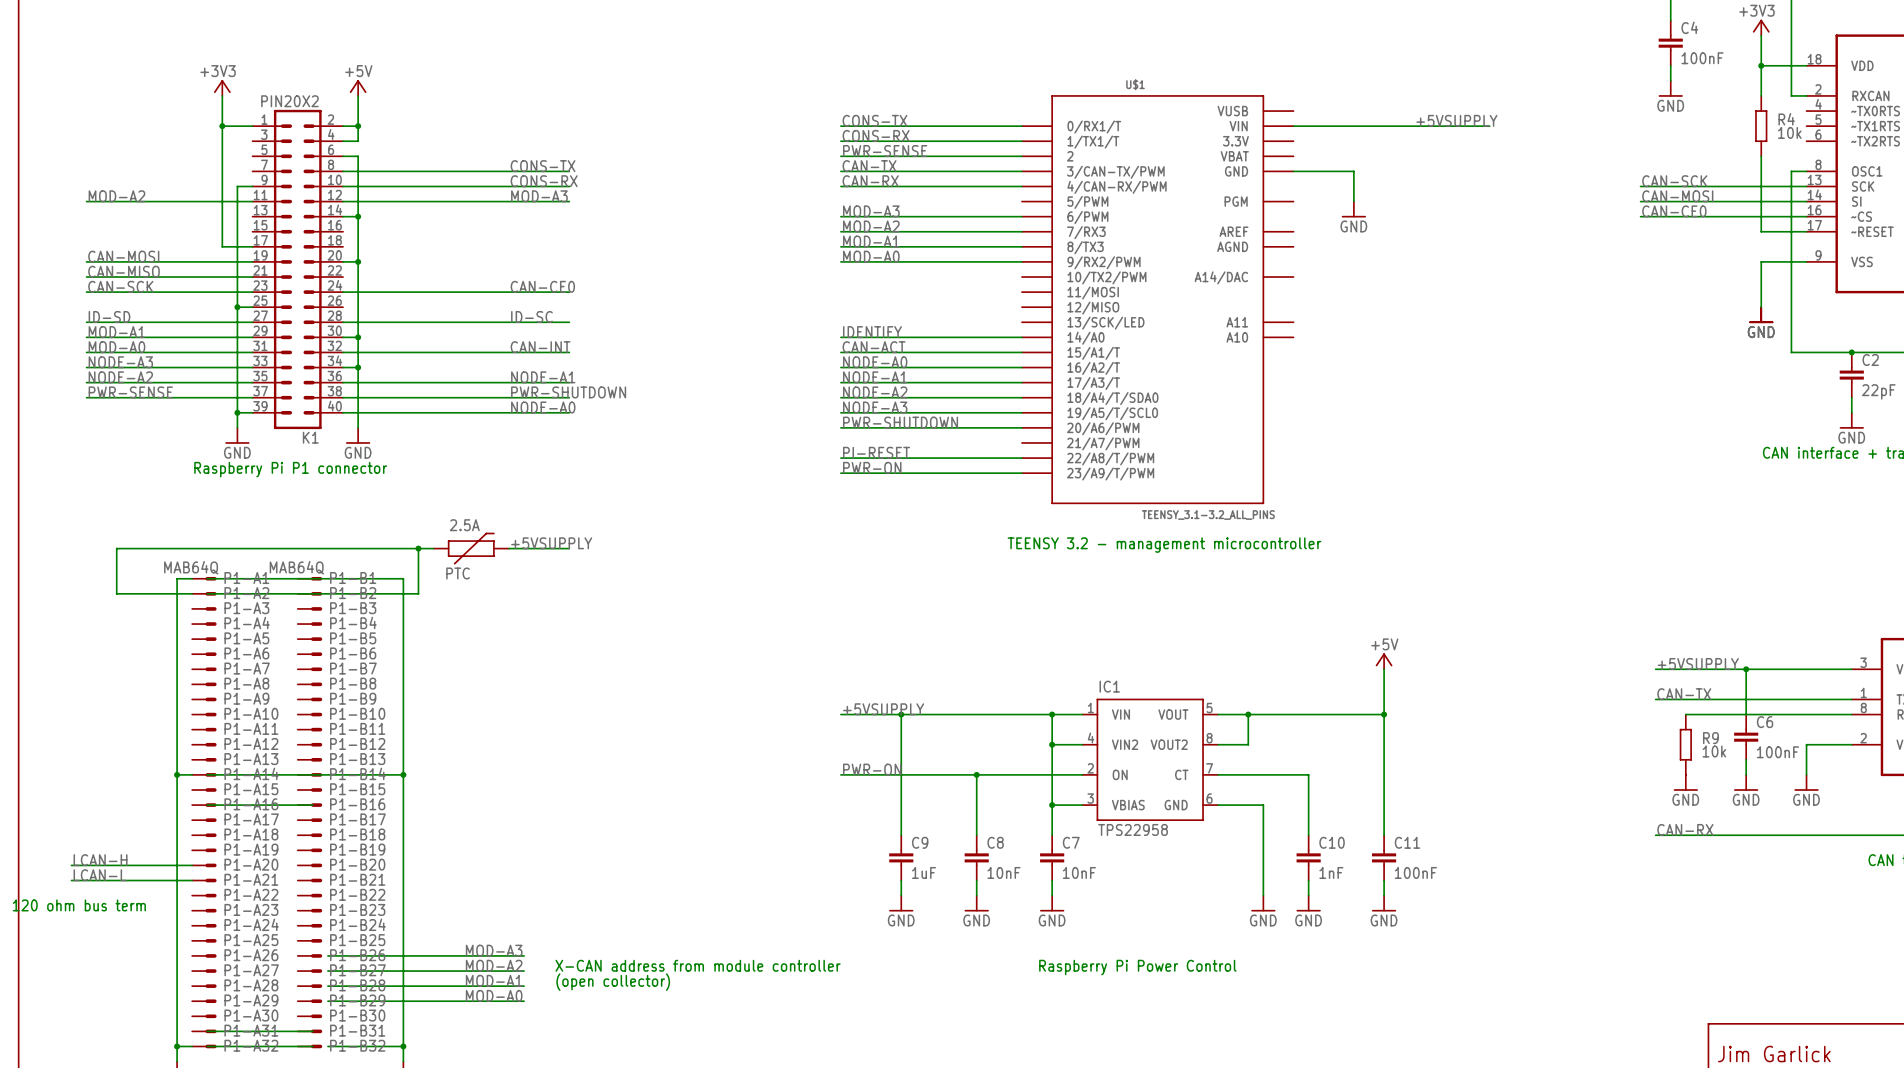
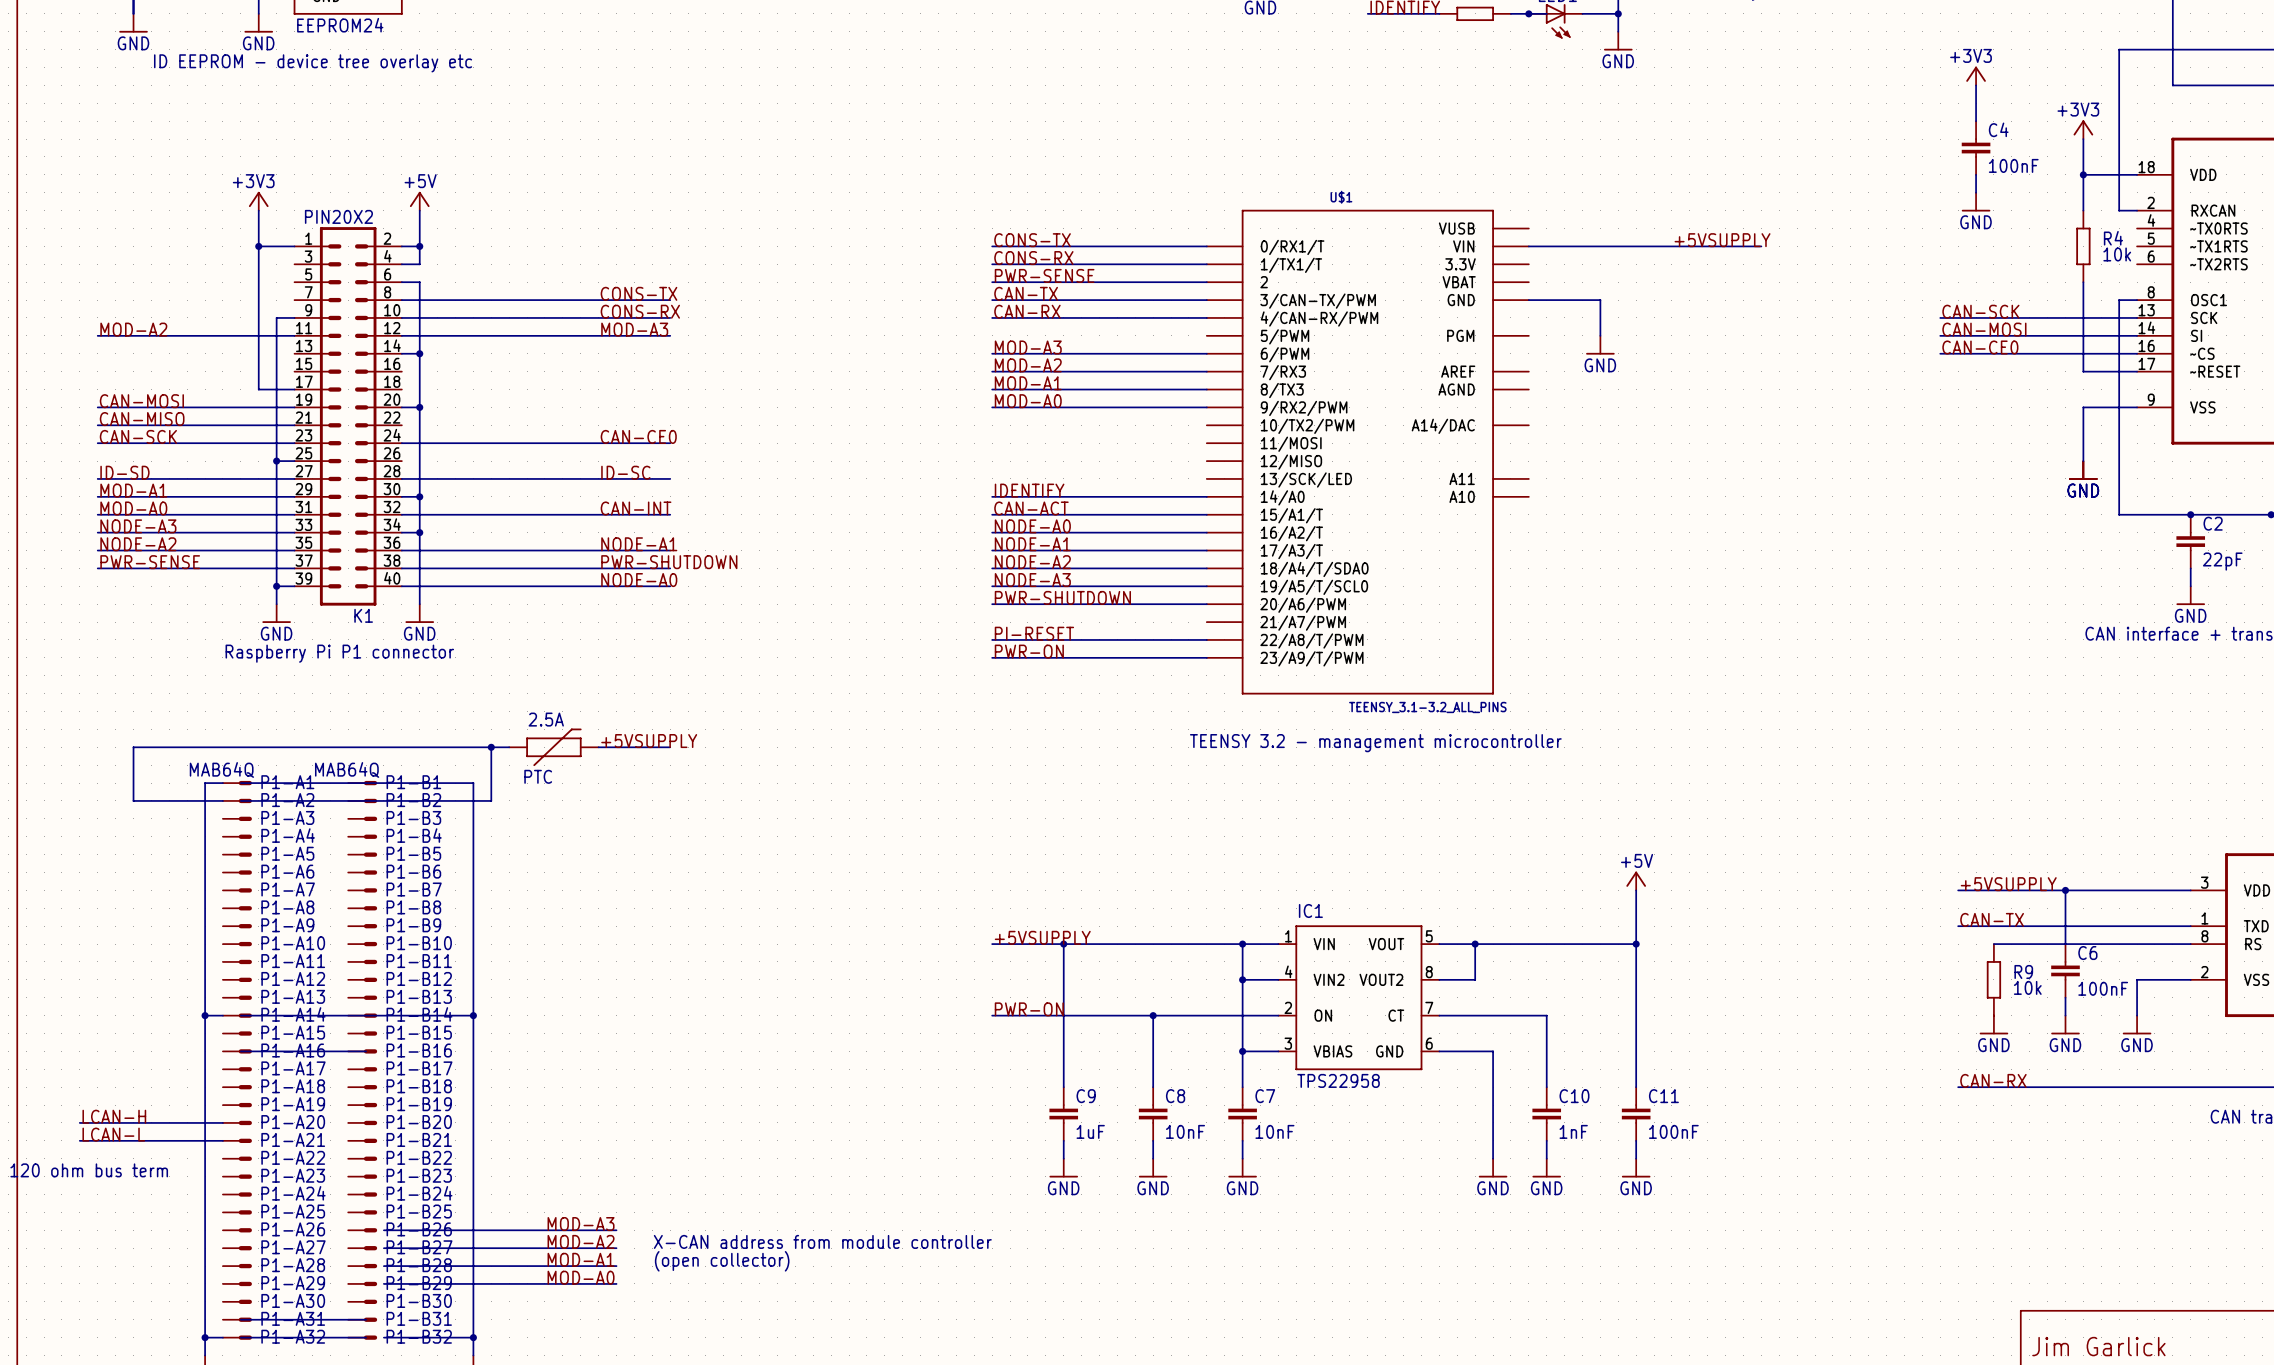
text: Raspberry Pi Power Control (1137, 967) -> none

